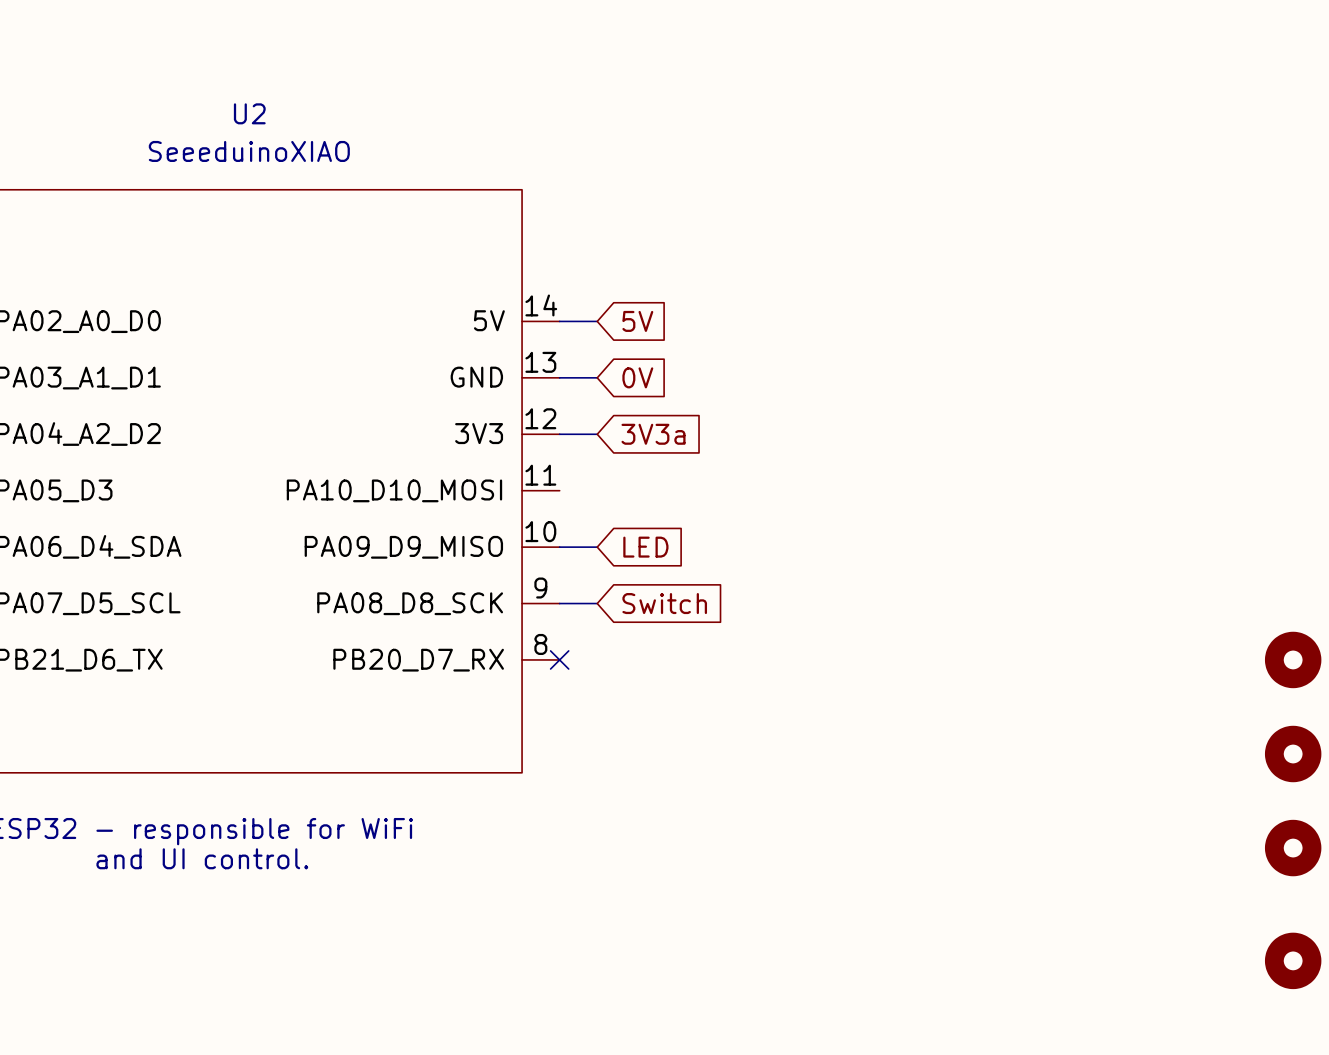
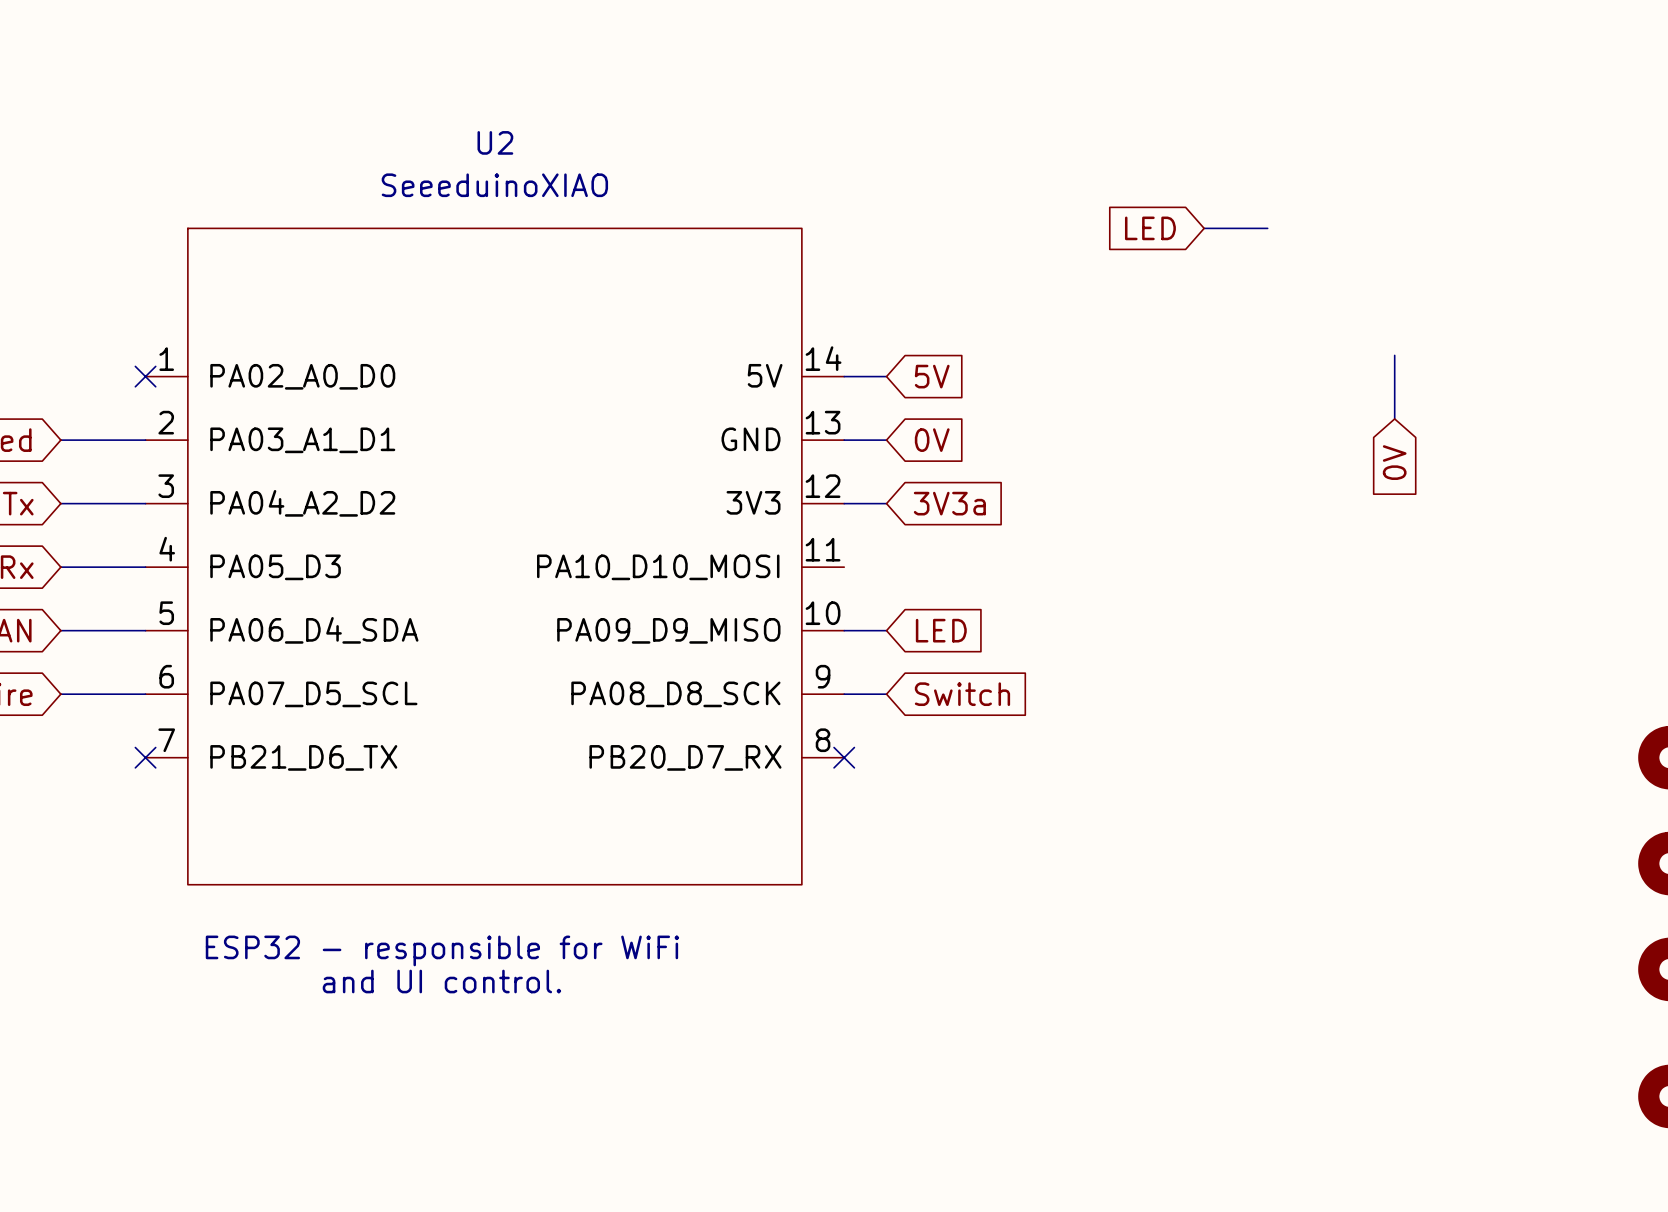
global label: none -> LED (1150, 228)
wire: none -> (1204, 228) (1267, 228)
wire: none -> (1394, 355) (1394, 418)
global label: none -> 0V (1394, 462)

